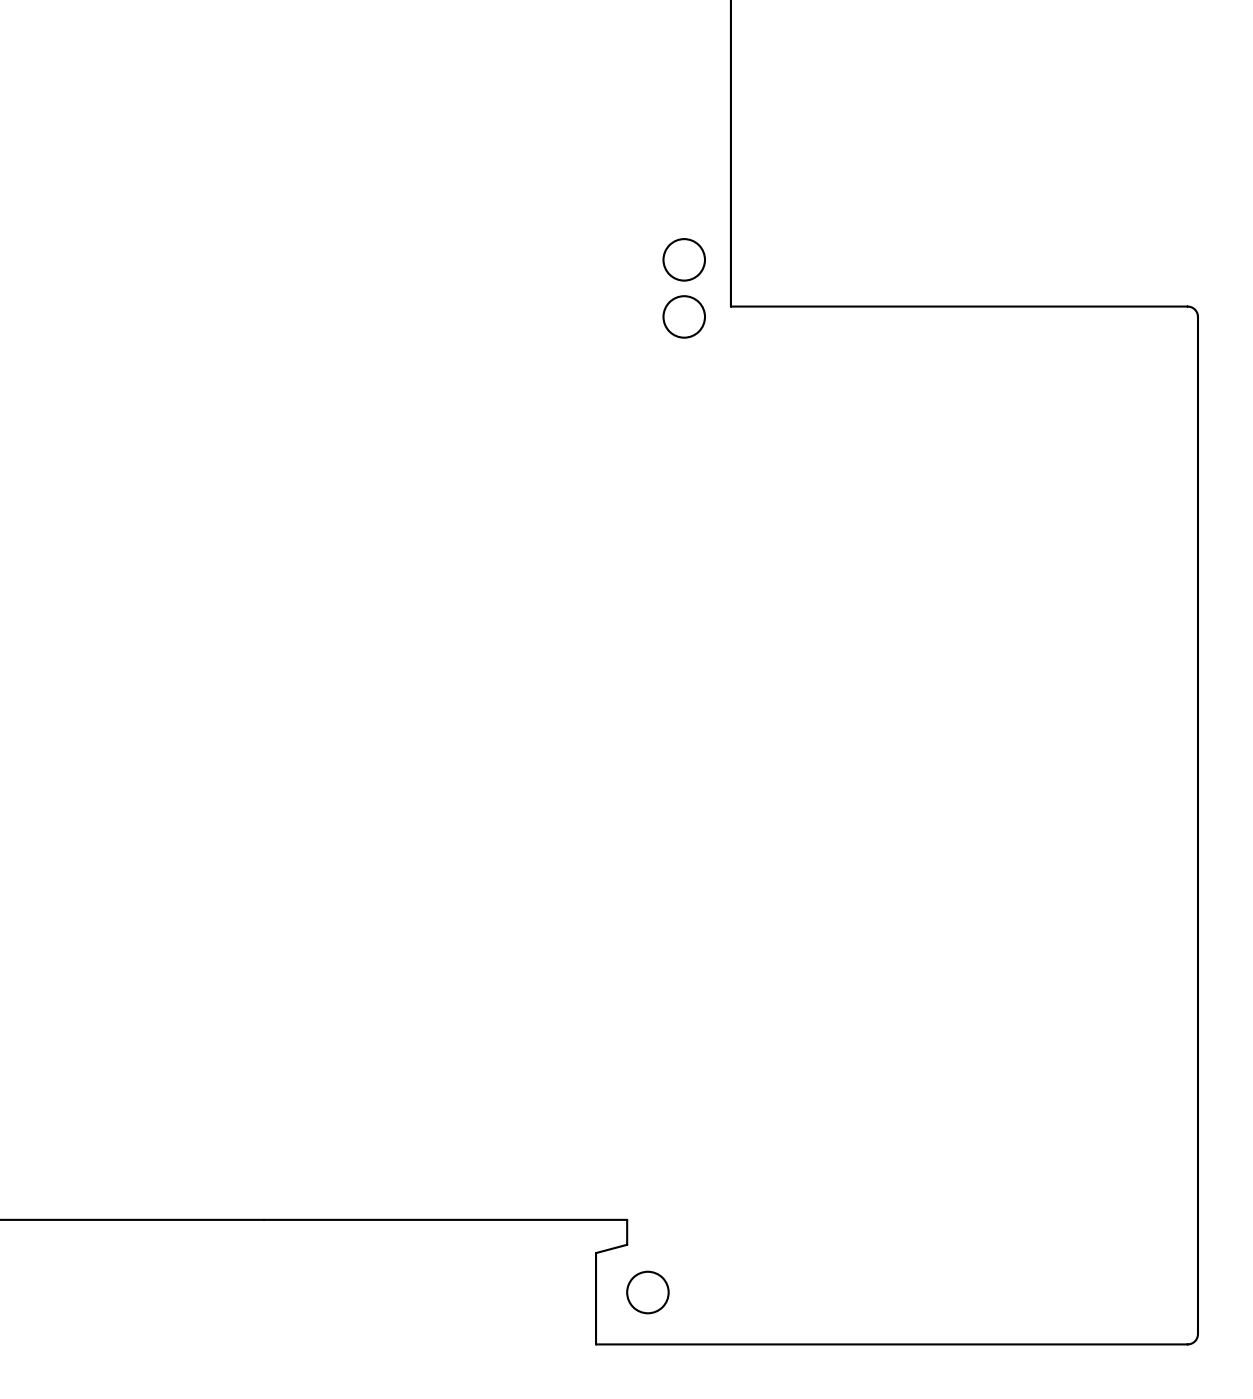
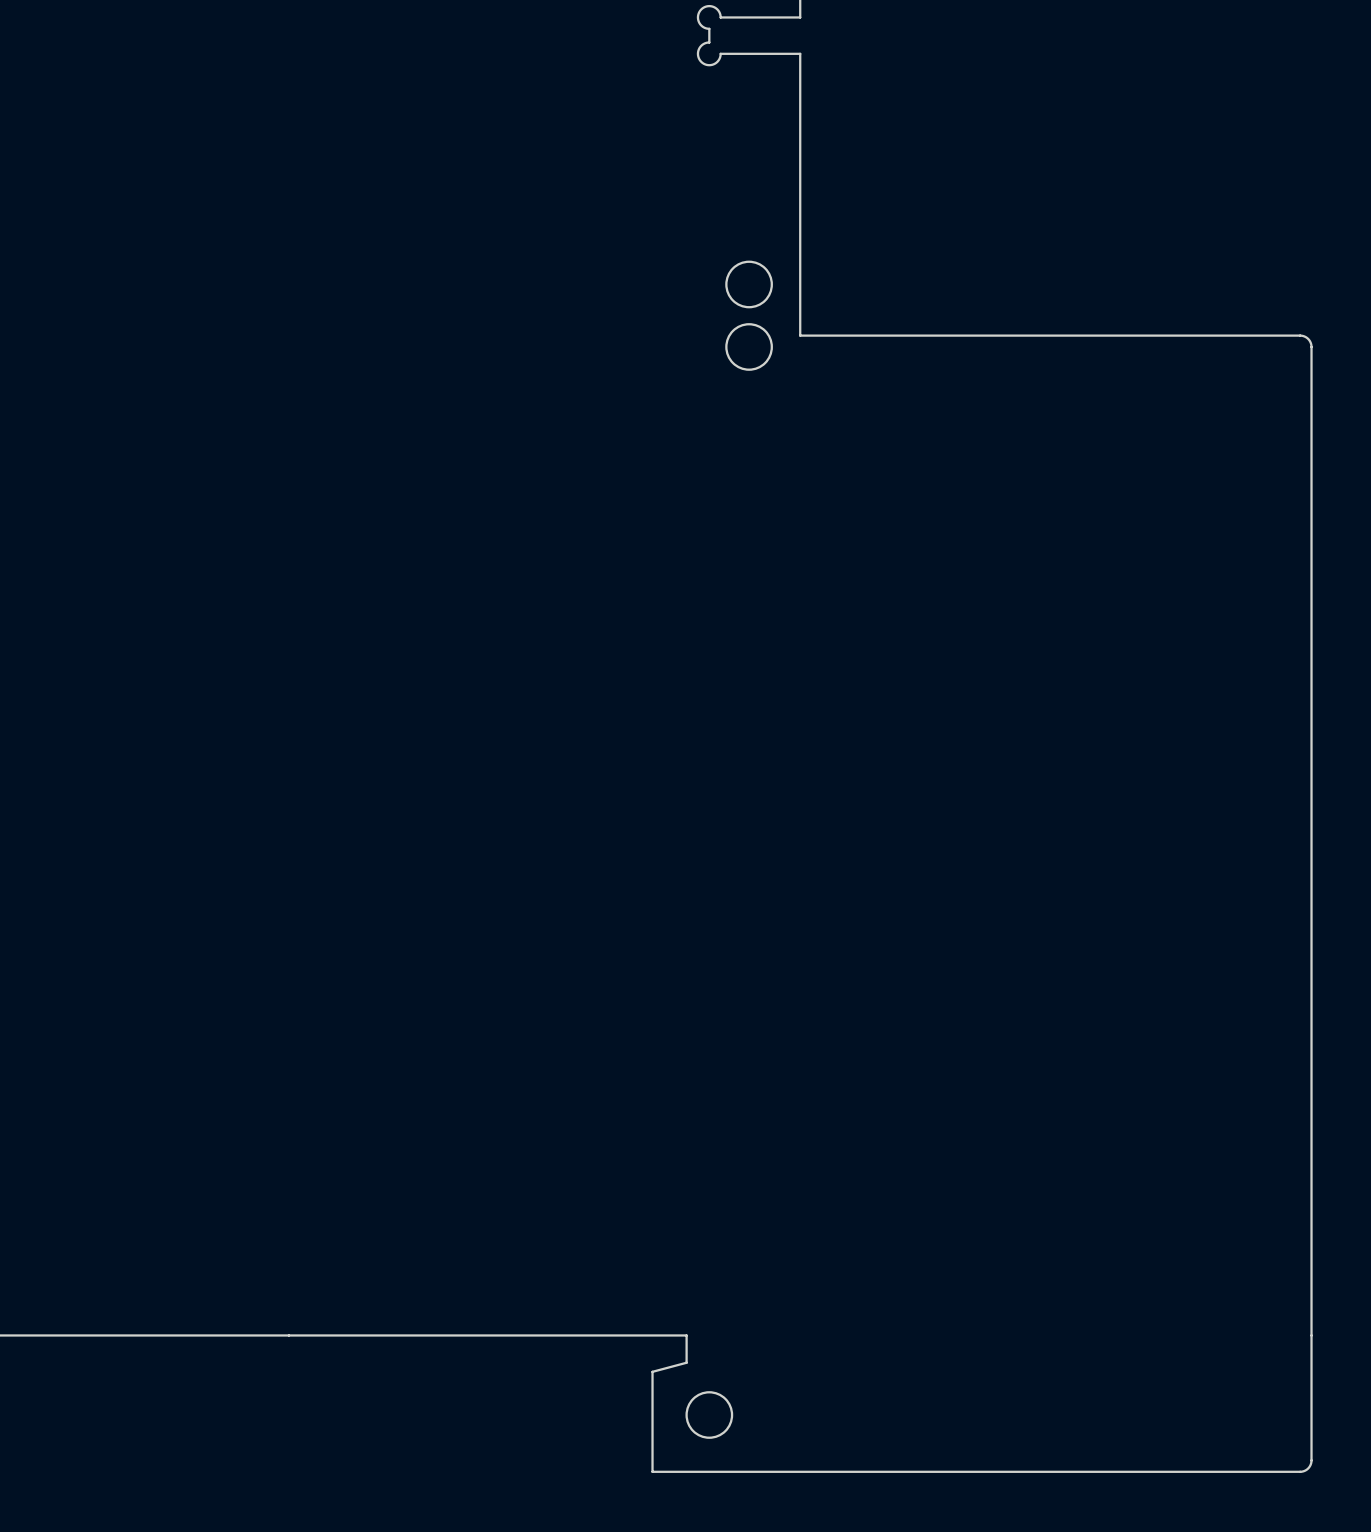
board edge: (730, 15) (730, 49) -> (800, 17) (720, 17) (717, 9) (709, 6) (701, 9) (697, 17) (701, 25) (709, 28) (709, 42) (701, 45) (698, 52) (699, 59) (704, 64) (715, 63) (719, 59) (720, 53) (800, 53)

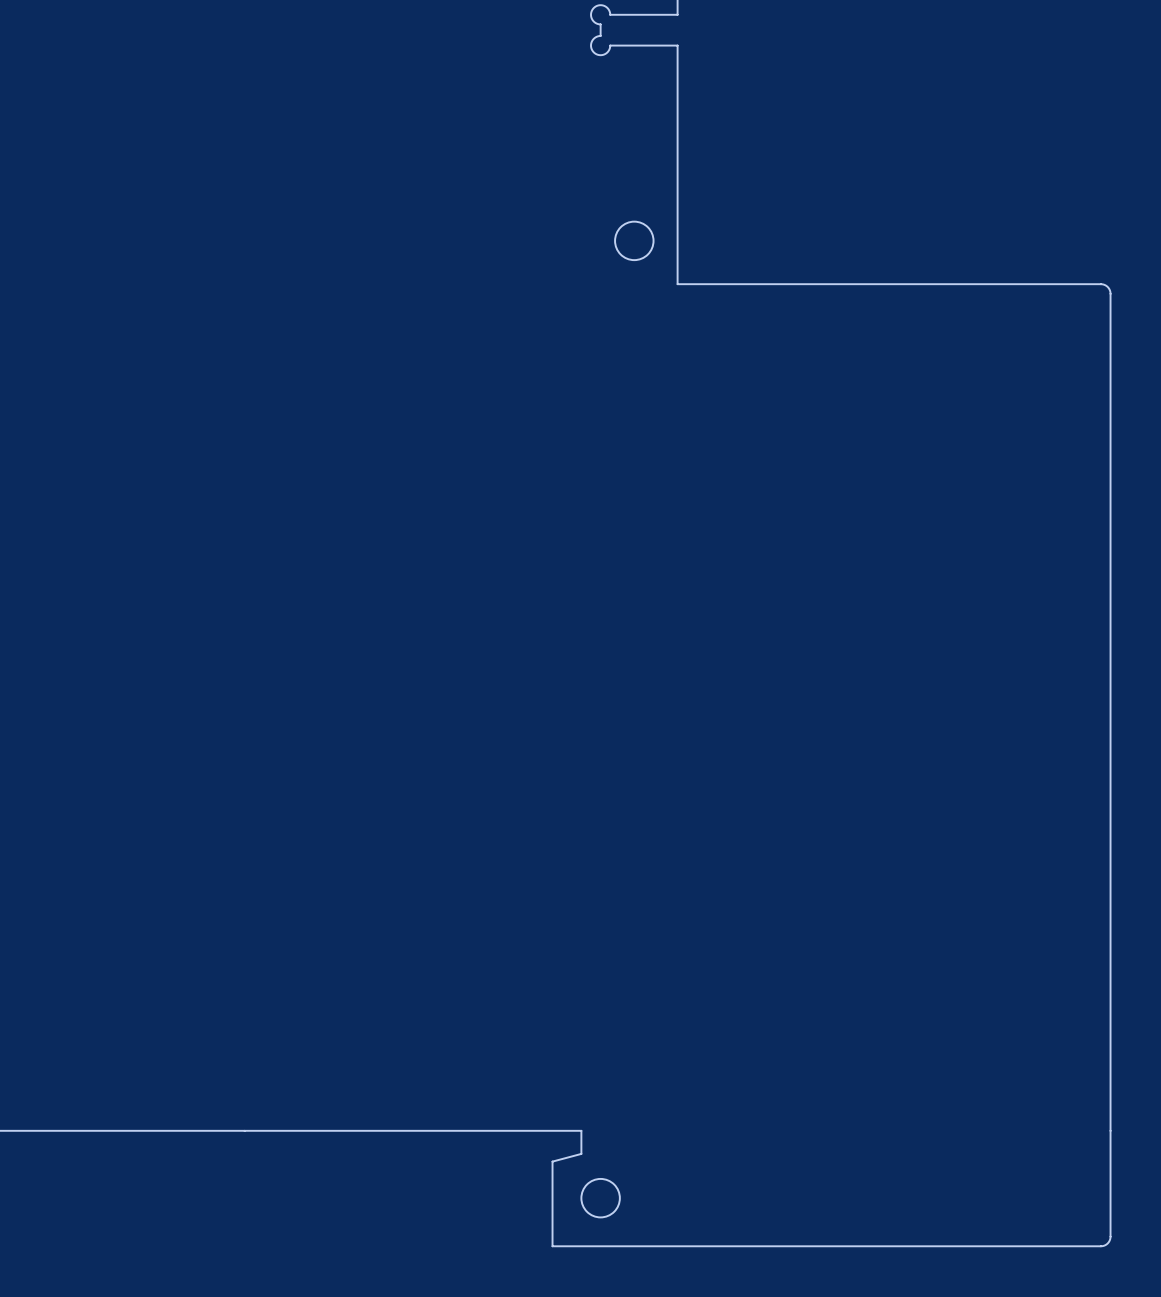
round board edge: [725, 323, 773, 371] -> none

